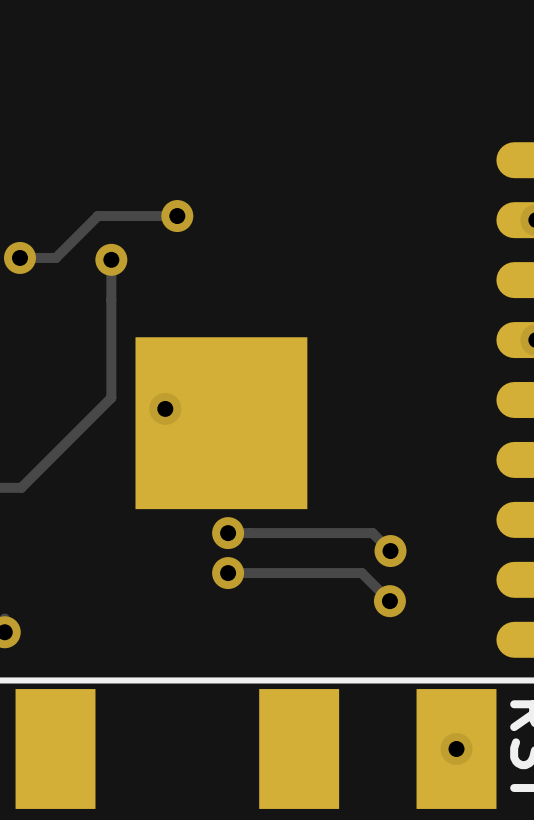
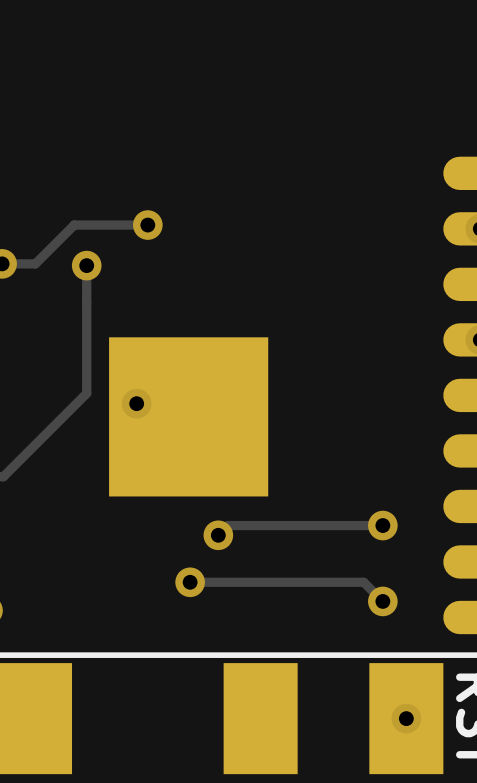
track: (228, 533) (372, 533) (390, 551) -> none
via: (228, 533) -> none
track: none -> (382, 525) (228, 525) (218, 535)
via: none -> (382, 525)
via: none -> (218, 535)
via: (390, 551) -> none
track: (228, 573) (361, 573) (389, 601) -> none
via: (228, 573) -> none
track: none -> (190, 582) (363, 582) (382, 601)
via: none -> (190, 582)
via: (389, 601) -> none
via: none -> (382, 601)

